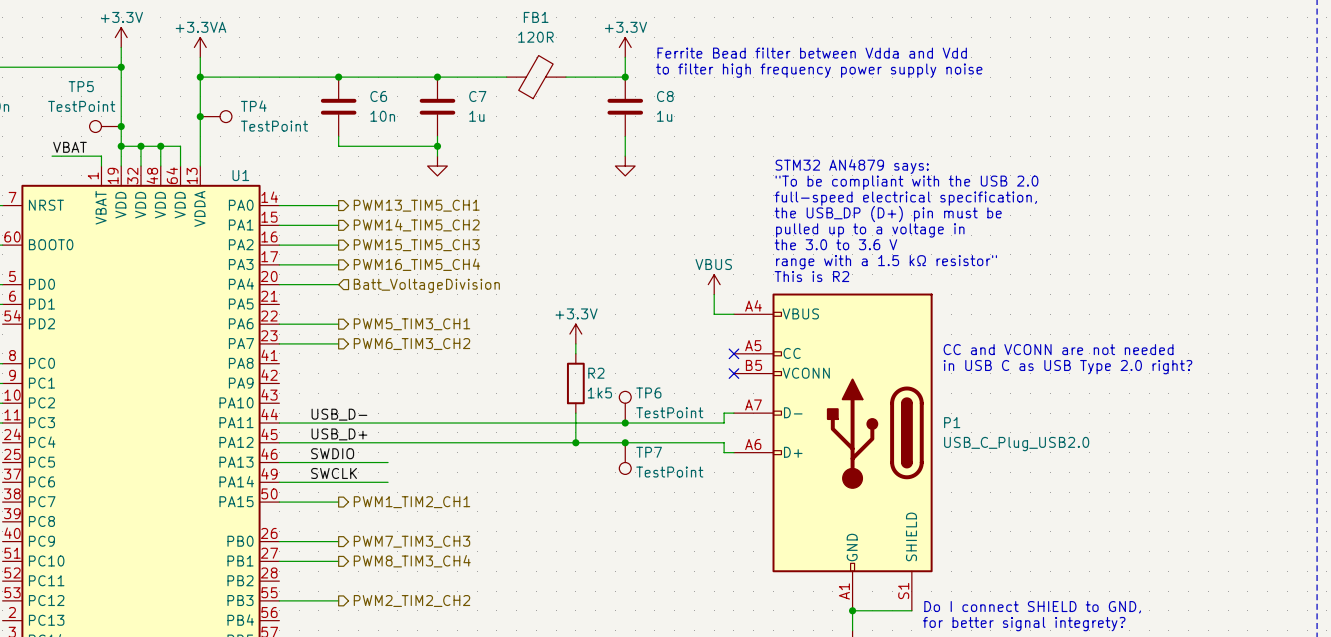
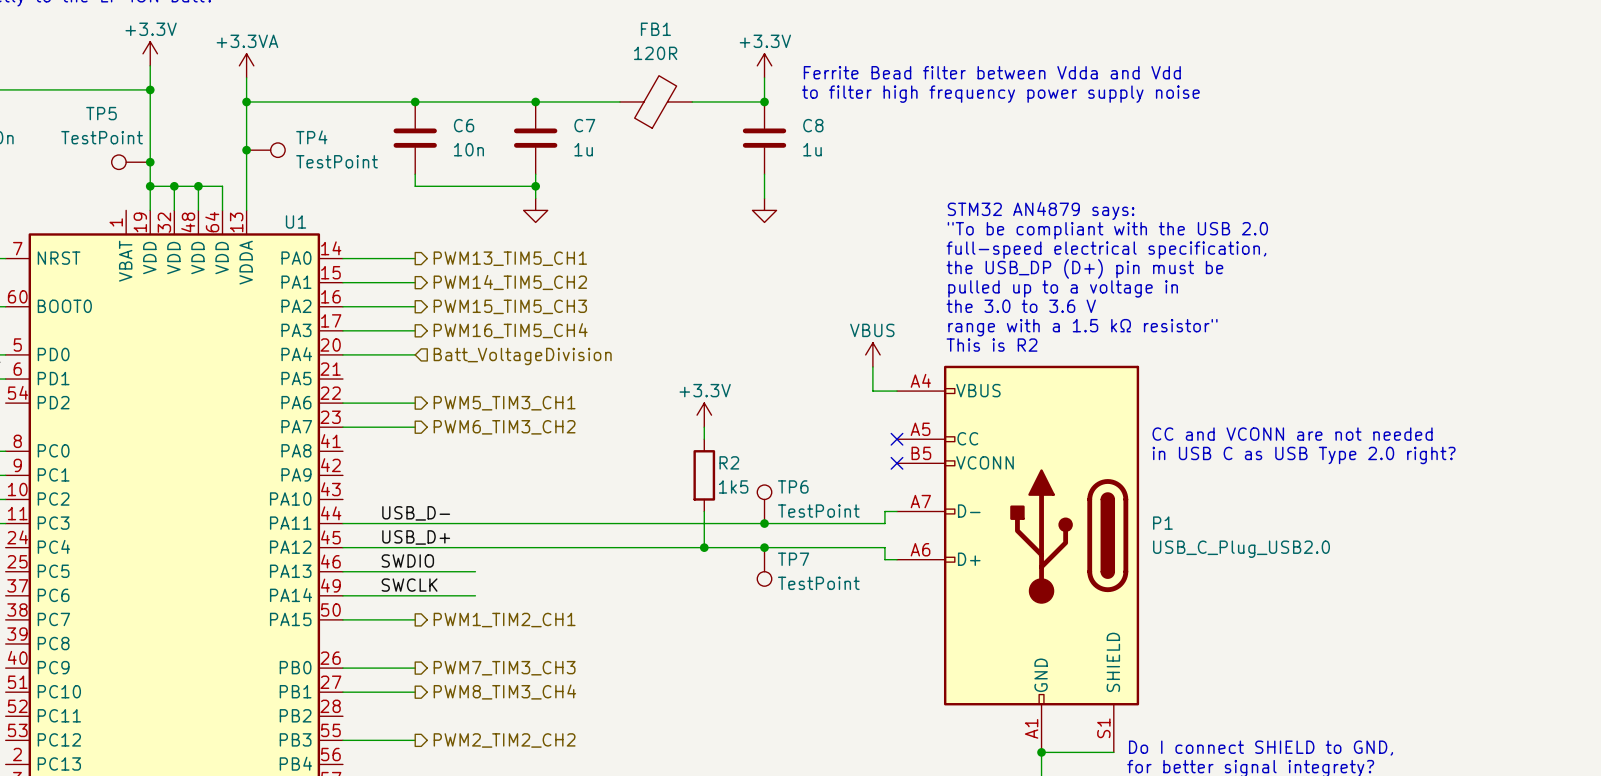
label: VBAT (70, 147) -> none
wire: (52, 156) (101, 156) (101, 166) -> none

